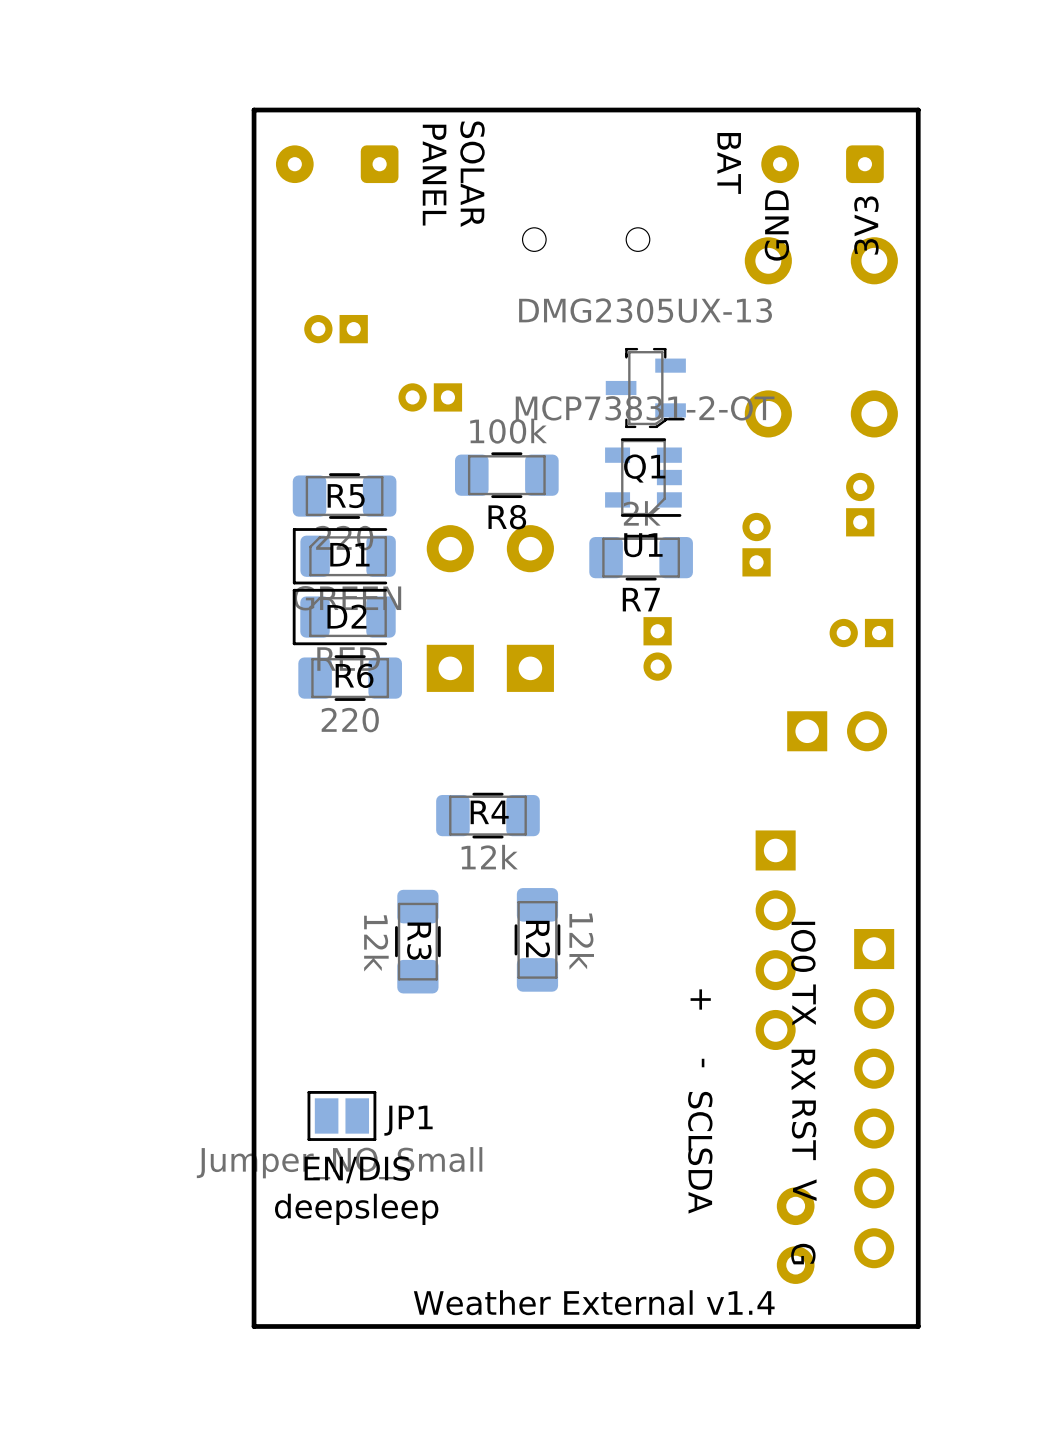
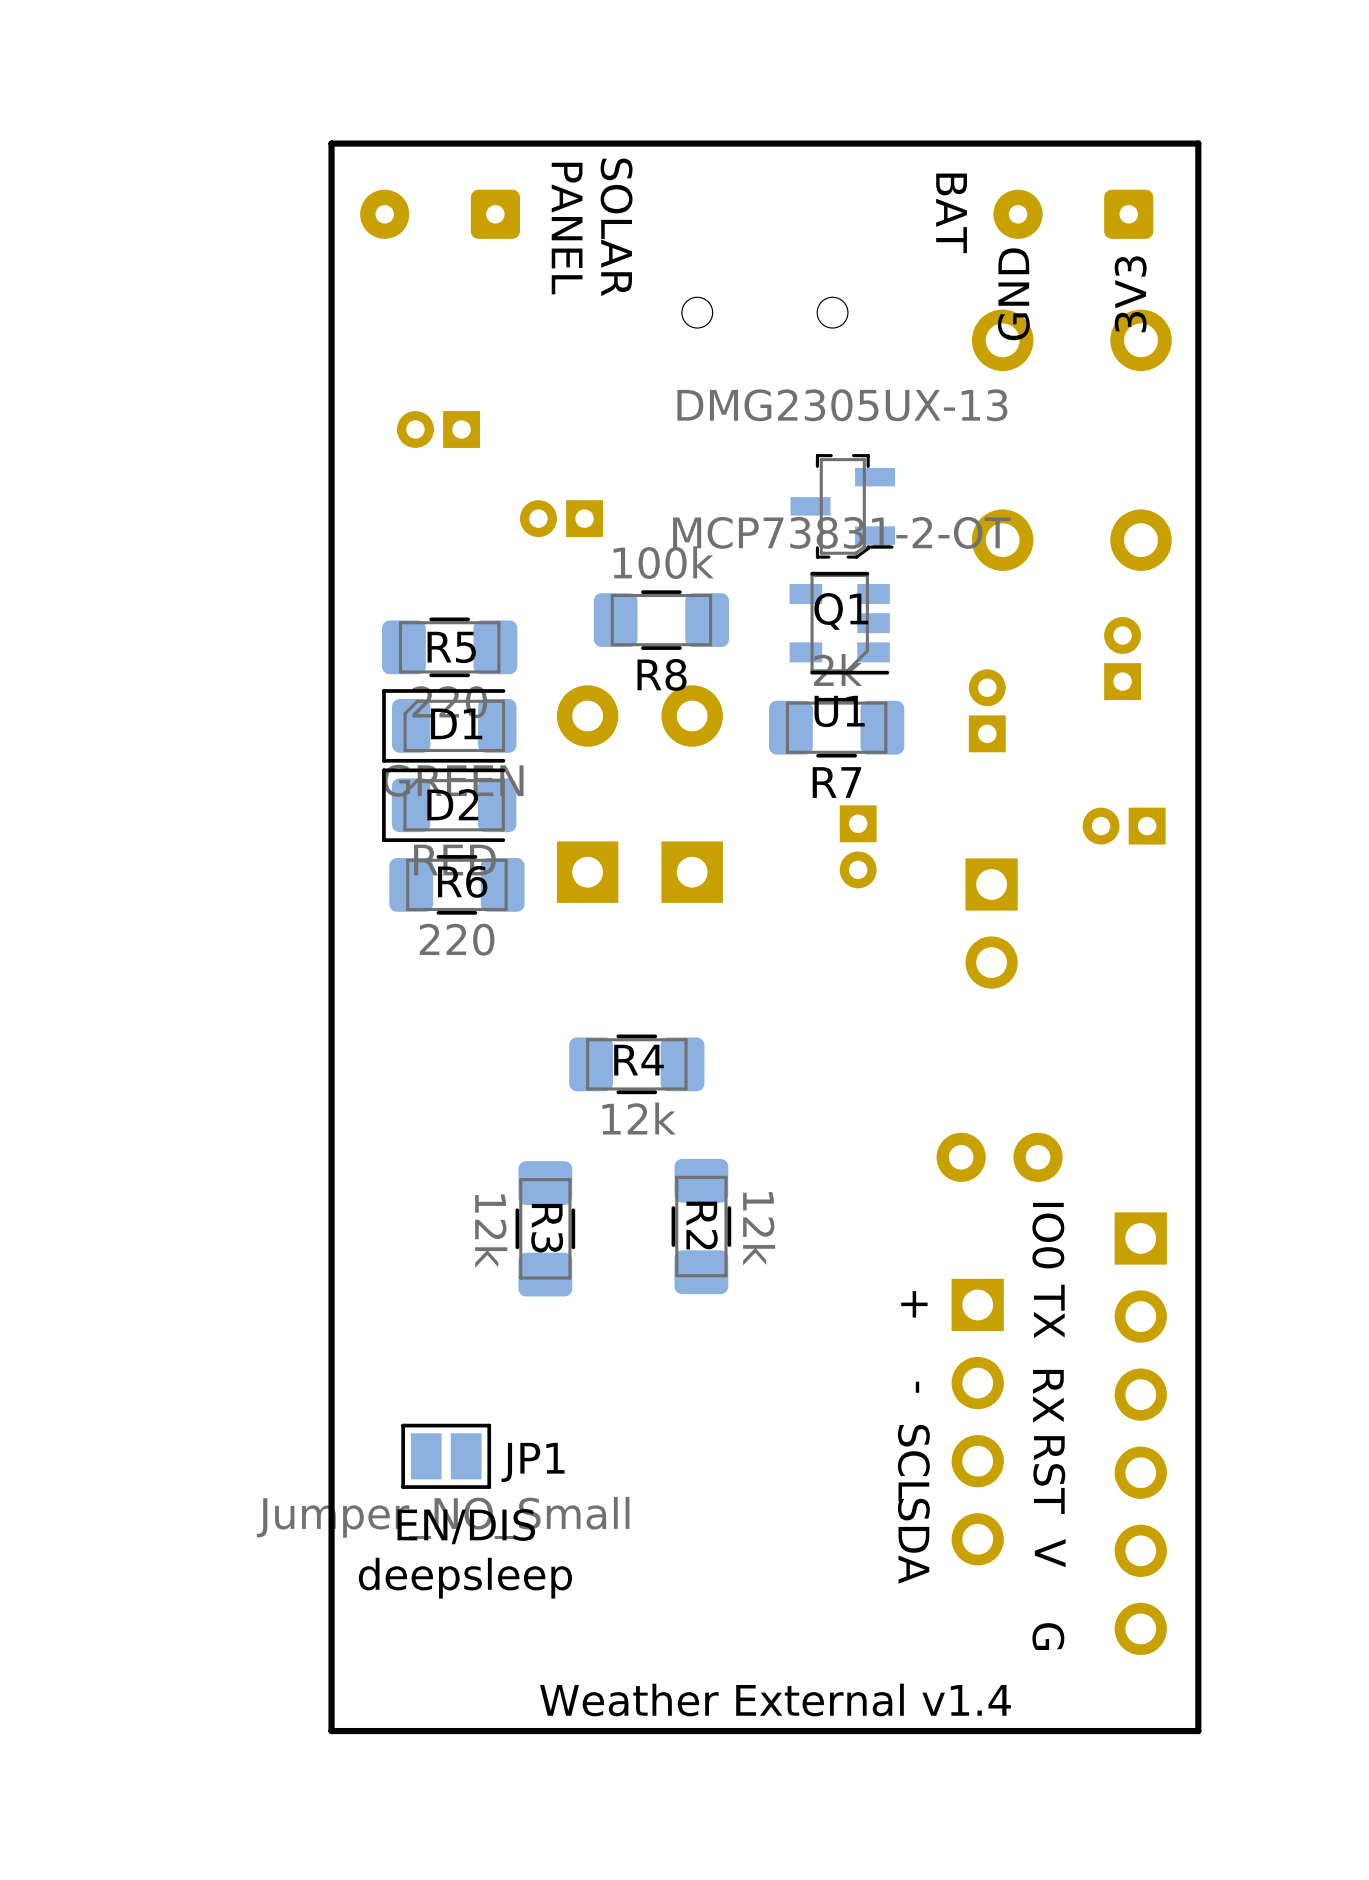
part rotation: 0° (837, 731) -> 90° clockwise (991, 923)
part position: (837, 731) -> (991, 923)
part position: (775, 940) -> (977, 1422)
part rotation: 0° (795, 1235) -> 90° clockwise (999, 1157)
part position: (795, 1235) -> (999, 1157)

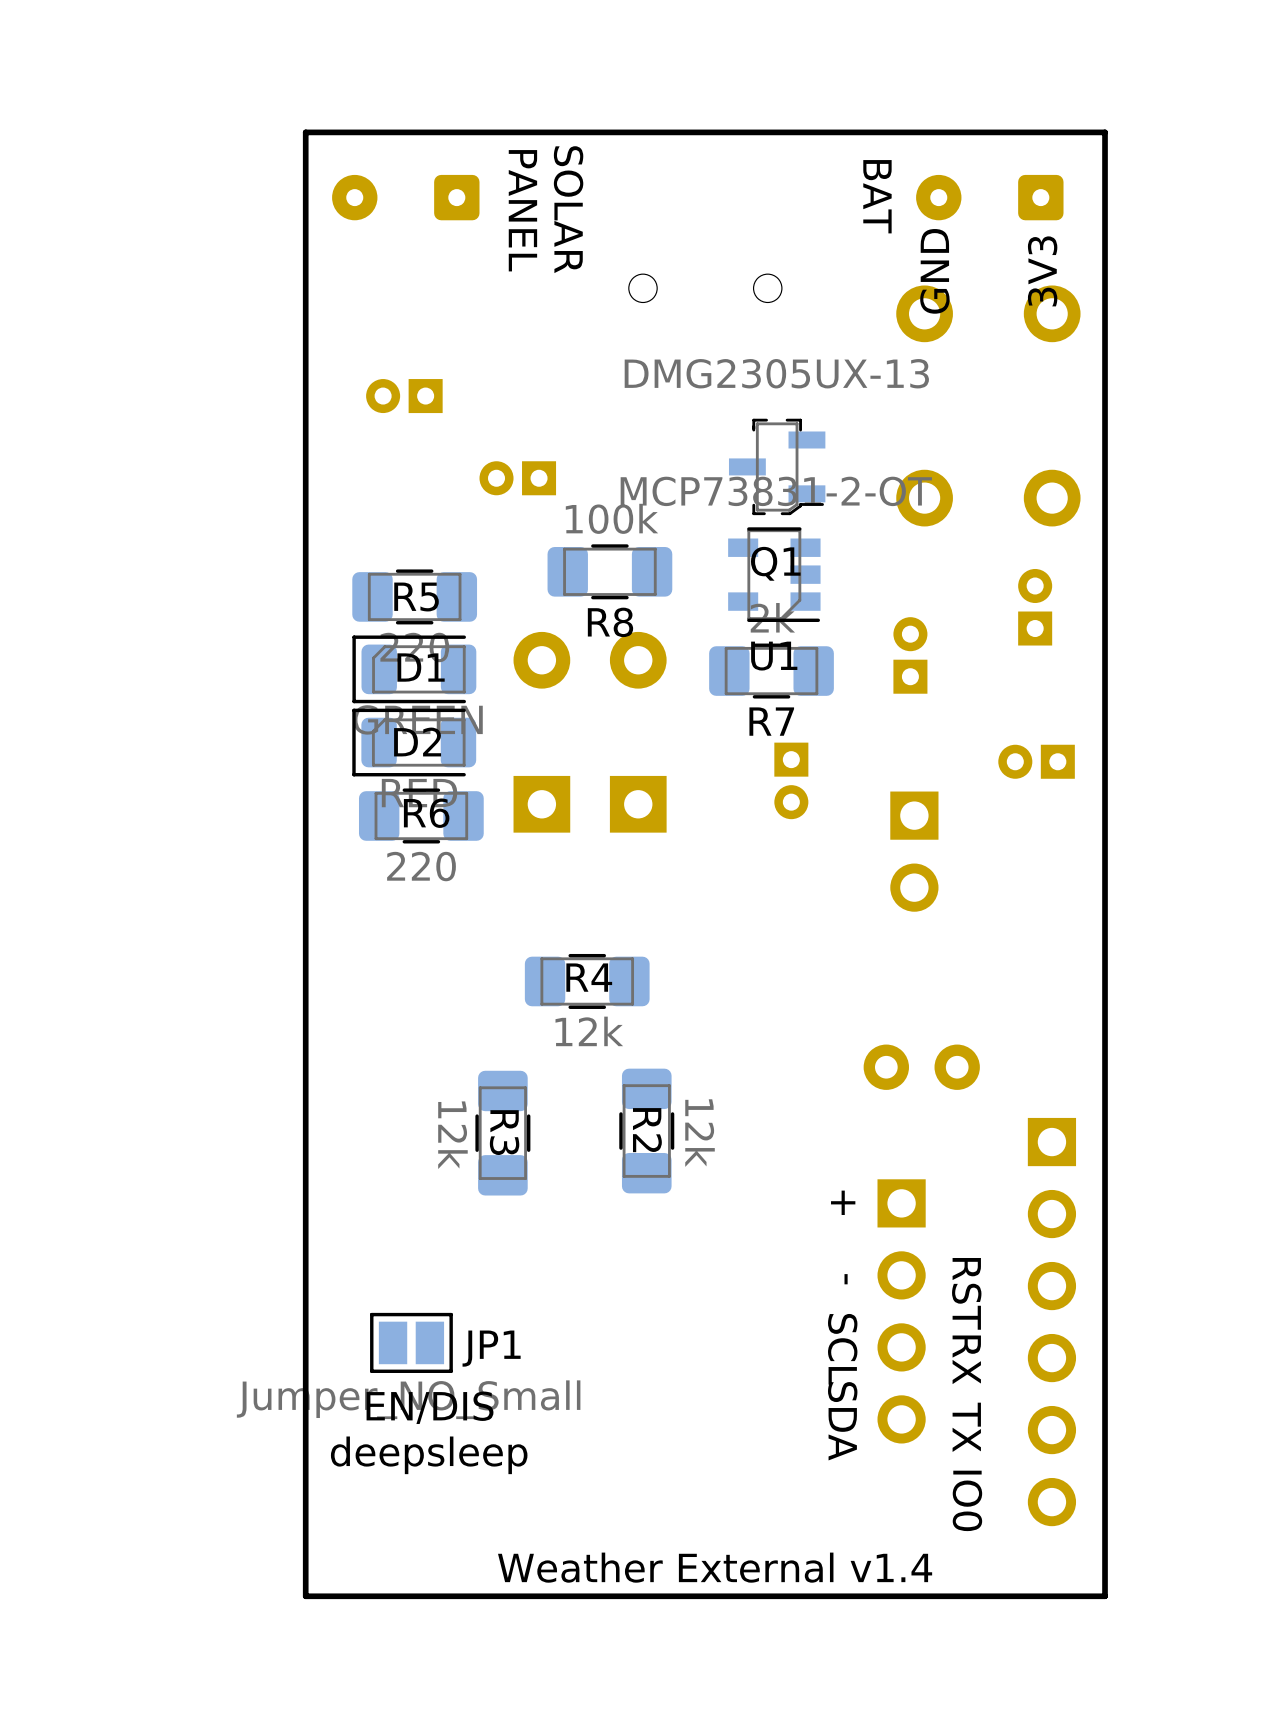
text: IO0 (1048, 1235) -> none
text: TX (1049, 1311) -> none
text: RX (1048, 1396) -> RST (966, 1293)
text: RST (1049, 1475) -> RX (966, 1359)
text: V (1050, 1553) -> TX (966, 1427)
text: G (1048, 1636) -> IO0 (967, 1500)

